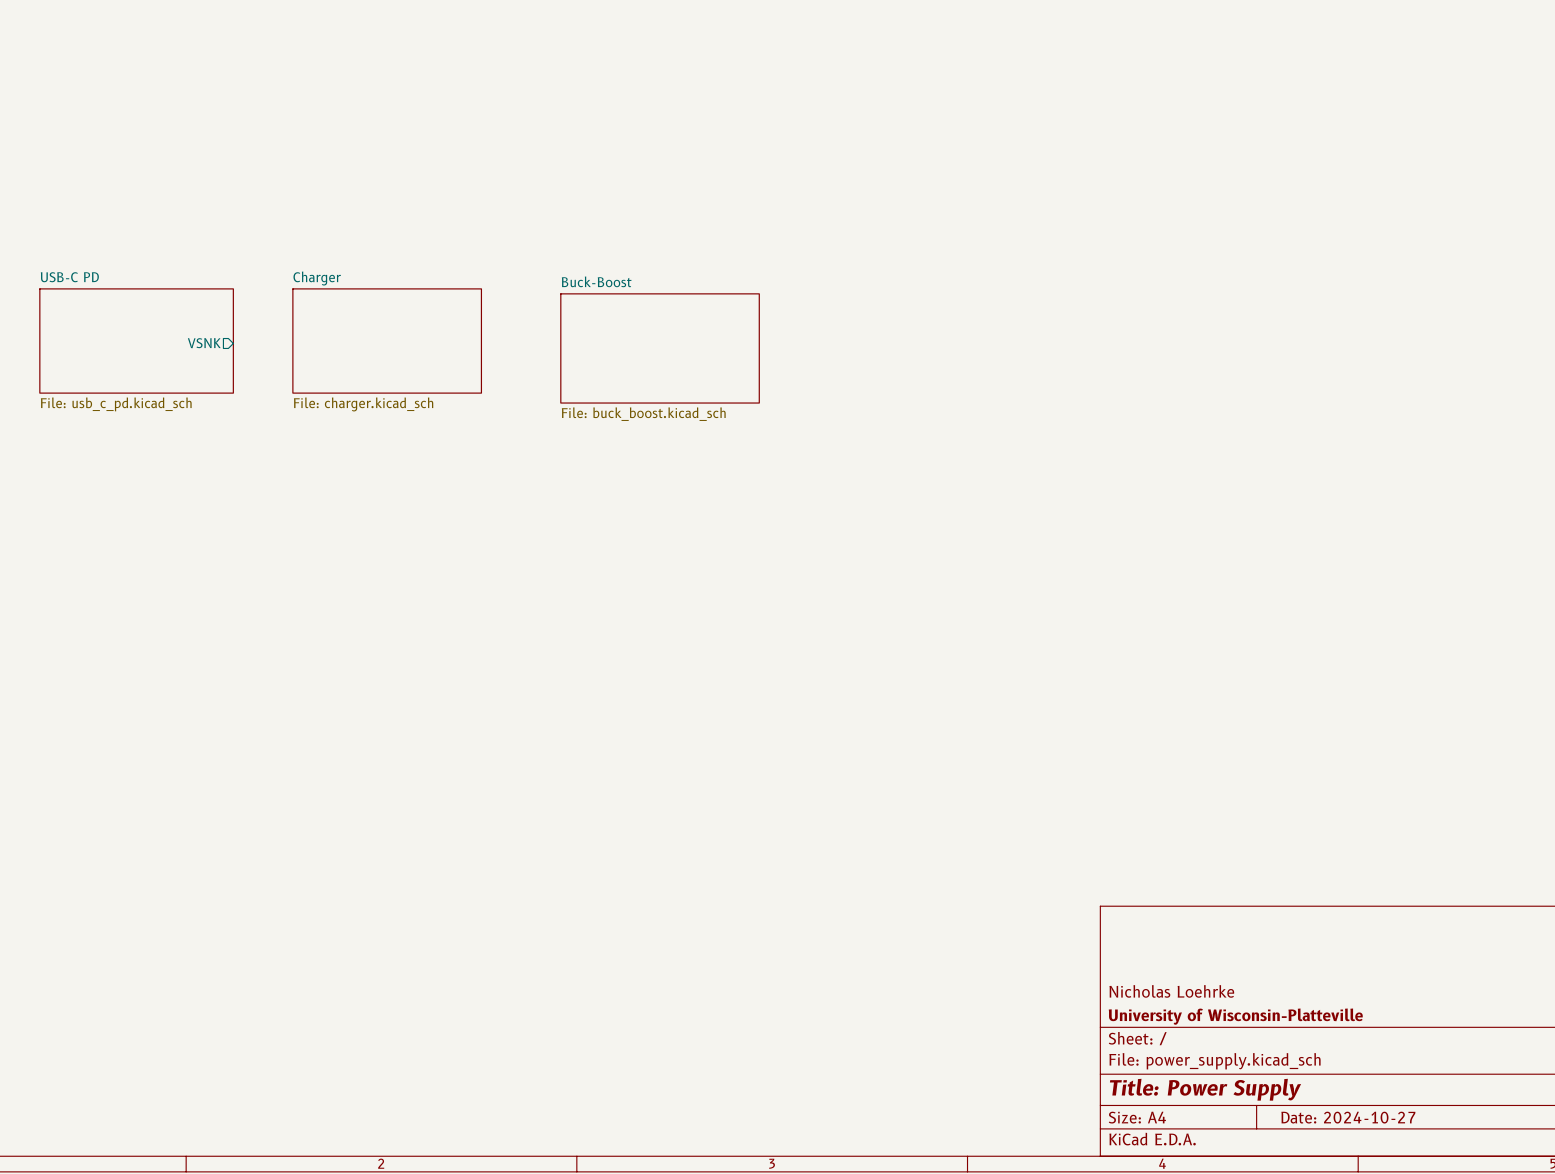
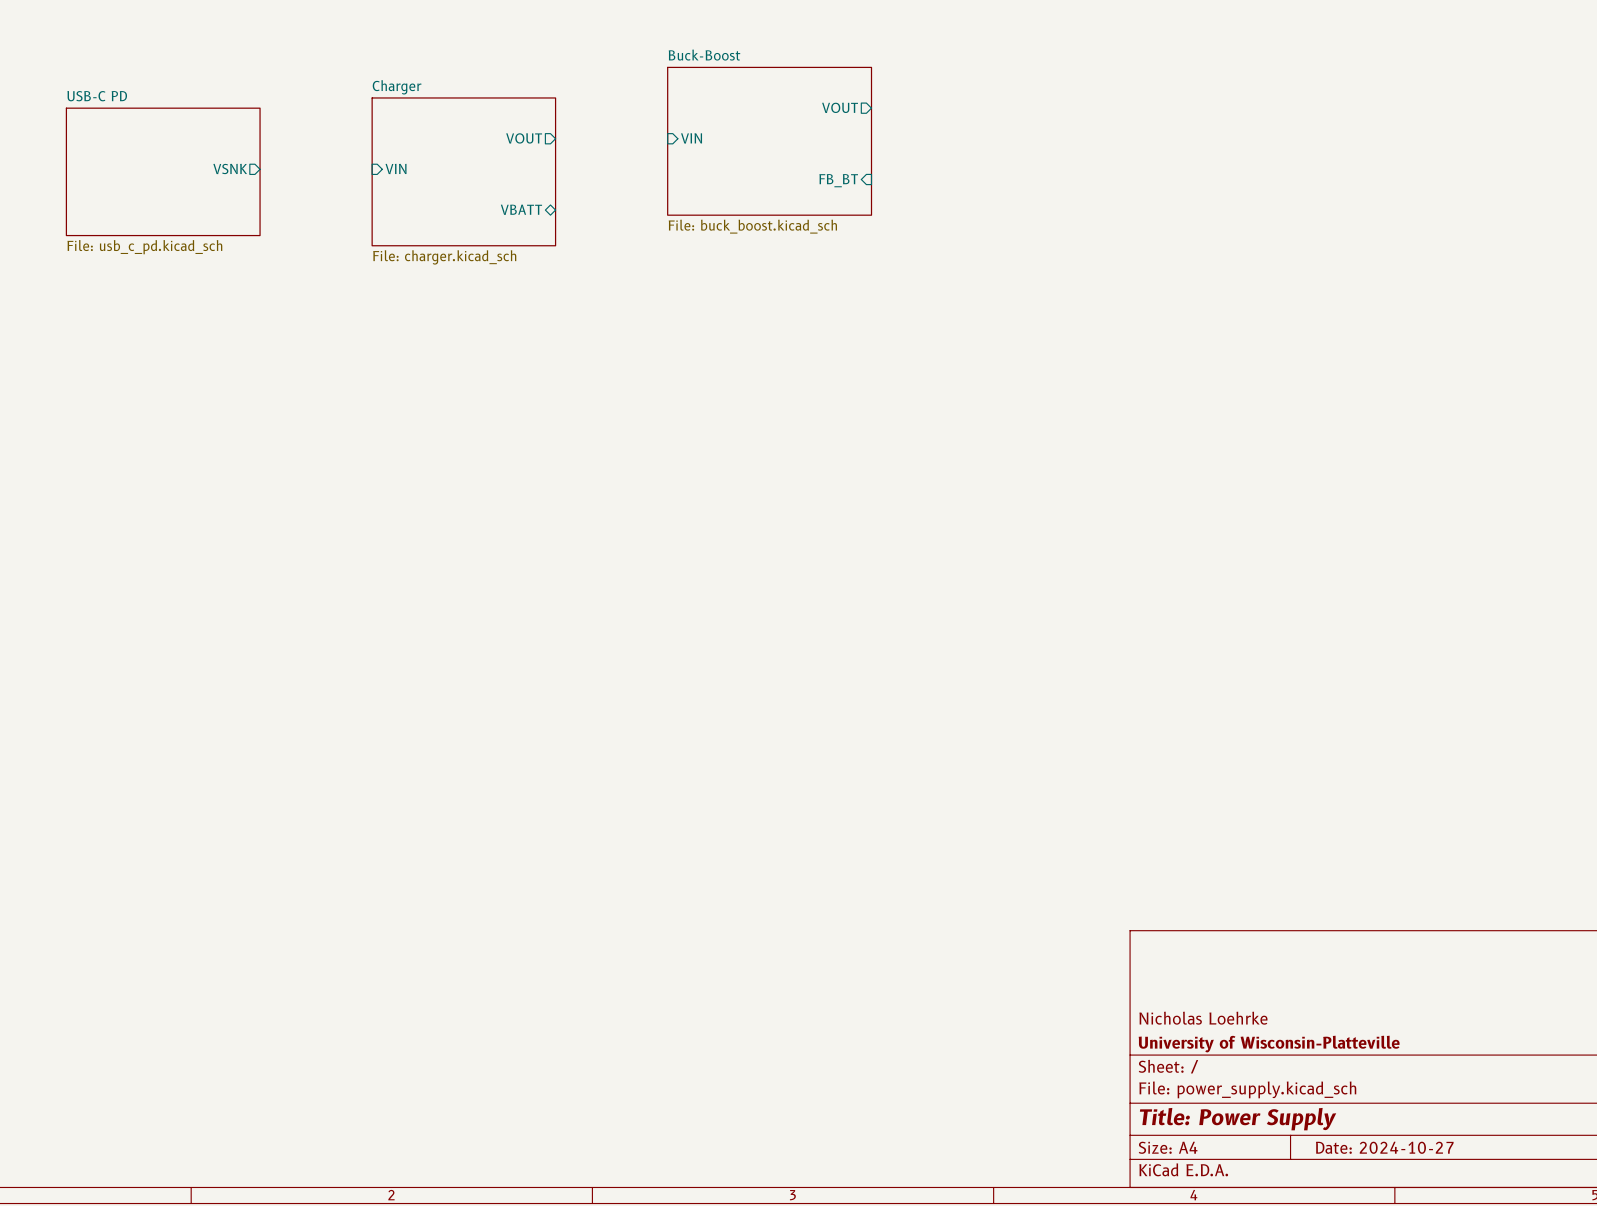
sheet pin: none -> VOUT (840, 107)
sheet pin: none -> VOUT (524, 138)
sheet pin: none -> VIN (691, 138)
sheet Buck-Boost: none -> File: buck_boost.kicad_sch (769, 141)
sheet pin: none -> VIN (396, 169)
sheet USB-C PD: none -> File: usb_c_pd.kicad_sch (163, 171)
sheet Charger: none -> File: charger.kicad_sch (463, 171)
sheet pin: none -> FB_BT (838, 180)
sheet pin: none -> VBATT (521, 209)
sheet USB-C PD: File: usb_c_pd.kicad_sch (136, 341) -> none
sheet Charger: File: charger.kicad_sch (387, 341) -> none
sheet pin position: VSNK (204, 343) -> VSNK (230, 169)
sheet Buck-Boost: File: buck_boost.kicad_sch (660, 348) -> none

